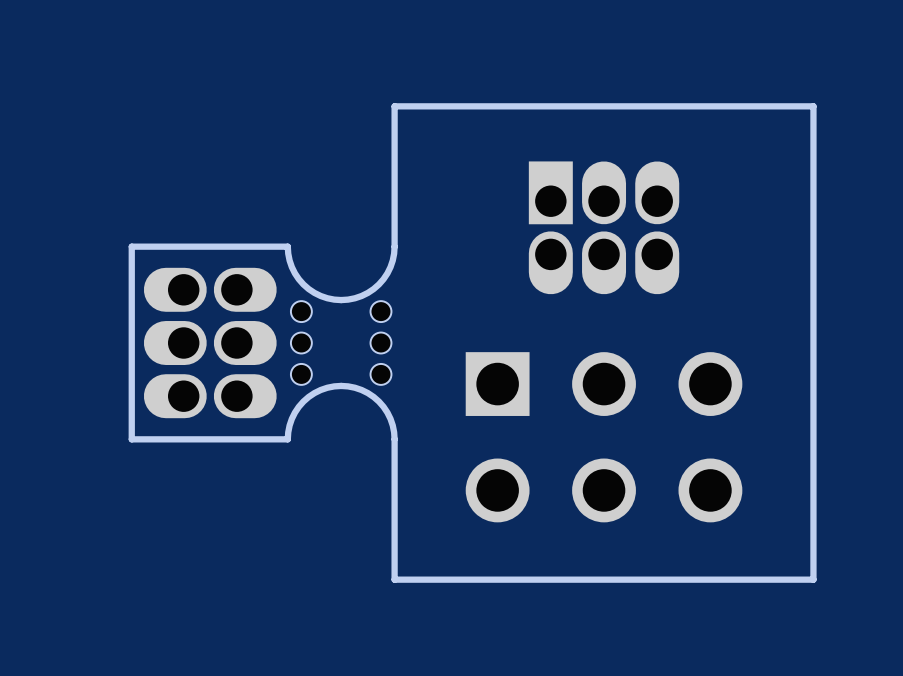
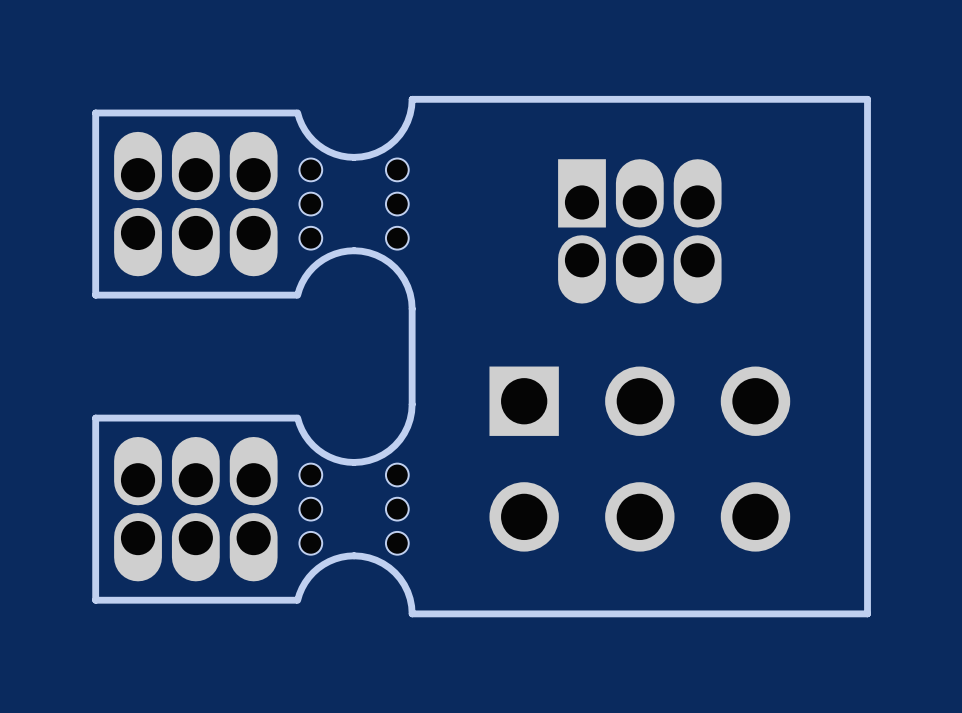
board edge: (394, 106) (394, 253) (387, 273) (378, 284) (367, 292) (355, 298) (341, 300) (327, 298) (314, 292) (303, 284) (294, 273) (289, 260) (287, 246) (131, 246) (131, 439) (287, 439) (289, 425) (294, 412) (303, 401) (314, 393) (327, 387) (341, 385) (355, 387) (367, 393) (378, 401) (387, 412) (394, 432) (394, 579) -> (354, 555) (376, 560) (395, 572) (407, 591) (412, 613)
board edge: none -> (412, 99) (407, 121) (400, 134) (383, 149) (361, 156) (341, 155) (323, 148) (305, 130) (297, 112)
board edge: none -> (296, 112) (95, 112) (95, 295) (296, 295)
part: none -> (195, 204)
part: none -> (354, 204)
board edge: none -> (297, 295) (305, 277) (323, 259) (341, 252) (361, 251) (383, 258) (400, 273) (407, 286) (412, 308) (411, 412) (404, 433) (395, 445) (383, 454) (369, 460) (354, 462) (341, 461) (323, 453) (313, 445) (302, 430) (297, 417)
part: (210, 343) -> none
part: (341, 343) -> none
board edge: none -> (296, 418) (95, 418) (95, 600) (296, 600)
part: none -> (195, 509)
part: none -> (354, 509)
board edge: none -> (354, 555) (335, 559) (318, 568) (305, 582) (297, 600)

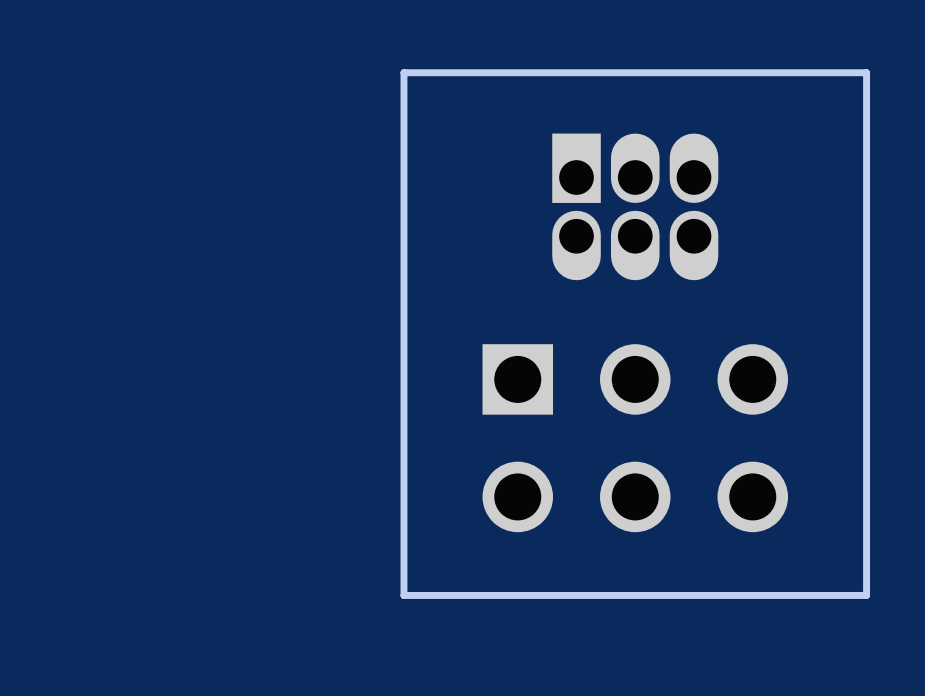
board edge: (412, 99) (407, 121) (400, 134) (383, 149) (361, 156) (341, 155) (323, 148) (305, 130) (297, 112) -> (403, 72) (403, 285)
board edge: (296, 112) (95, 112) (95, 295) (296, 295) -> none
part: (195, 204) -> none
part: (354, 204) -> none
board edge: (297, 295) (305, 277) (323, 259) (341, 252) (361, 251) (383, 258) (400, 273) (407, 286) (412, 308) -> none
board edge: (412, 404) (407, 426) (400, 439) (383, 454) (361, 461) (341, 461) (323, 453) (305, 435) (297, 417) -> none
board edge: (296, 418) (95, 418) (95, 600) (296, 600) -> none
part: (195, 509) -> none
part: (354, 509) -> none
board edge: (354, 555) (376, 560) (395, 572) (407, 591) (412, 613) -> (403, 382) (403, 595)
board edge: (354, 555) (335, 559) (318, 568) (305, 582) (297, 600) -> none

